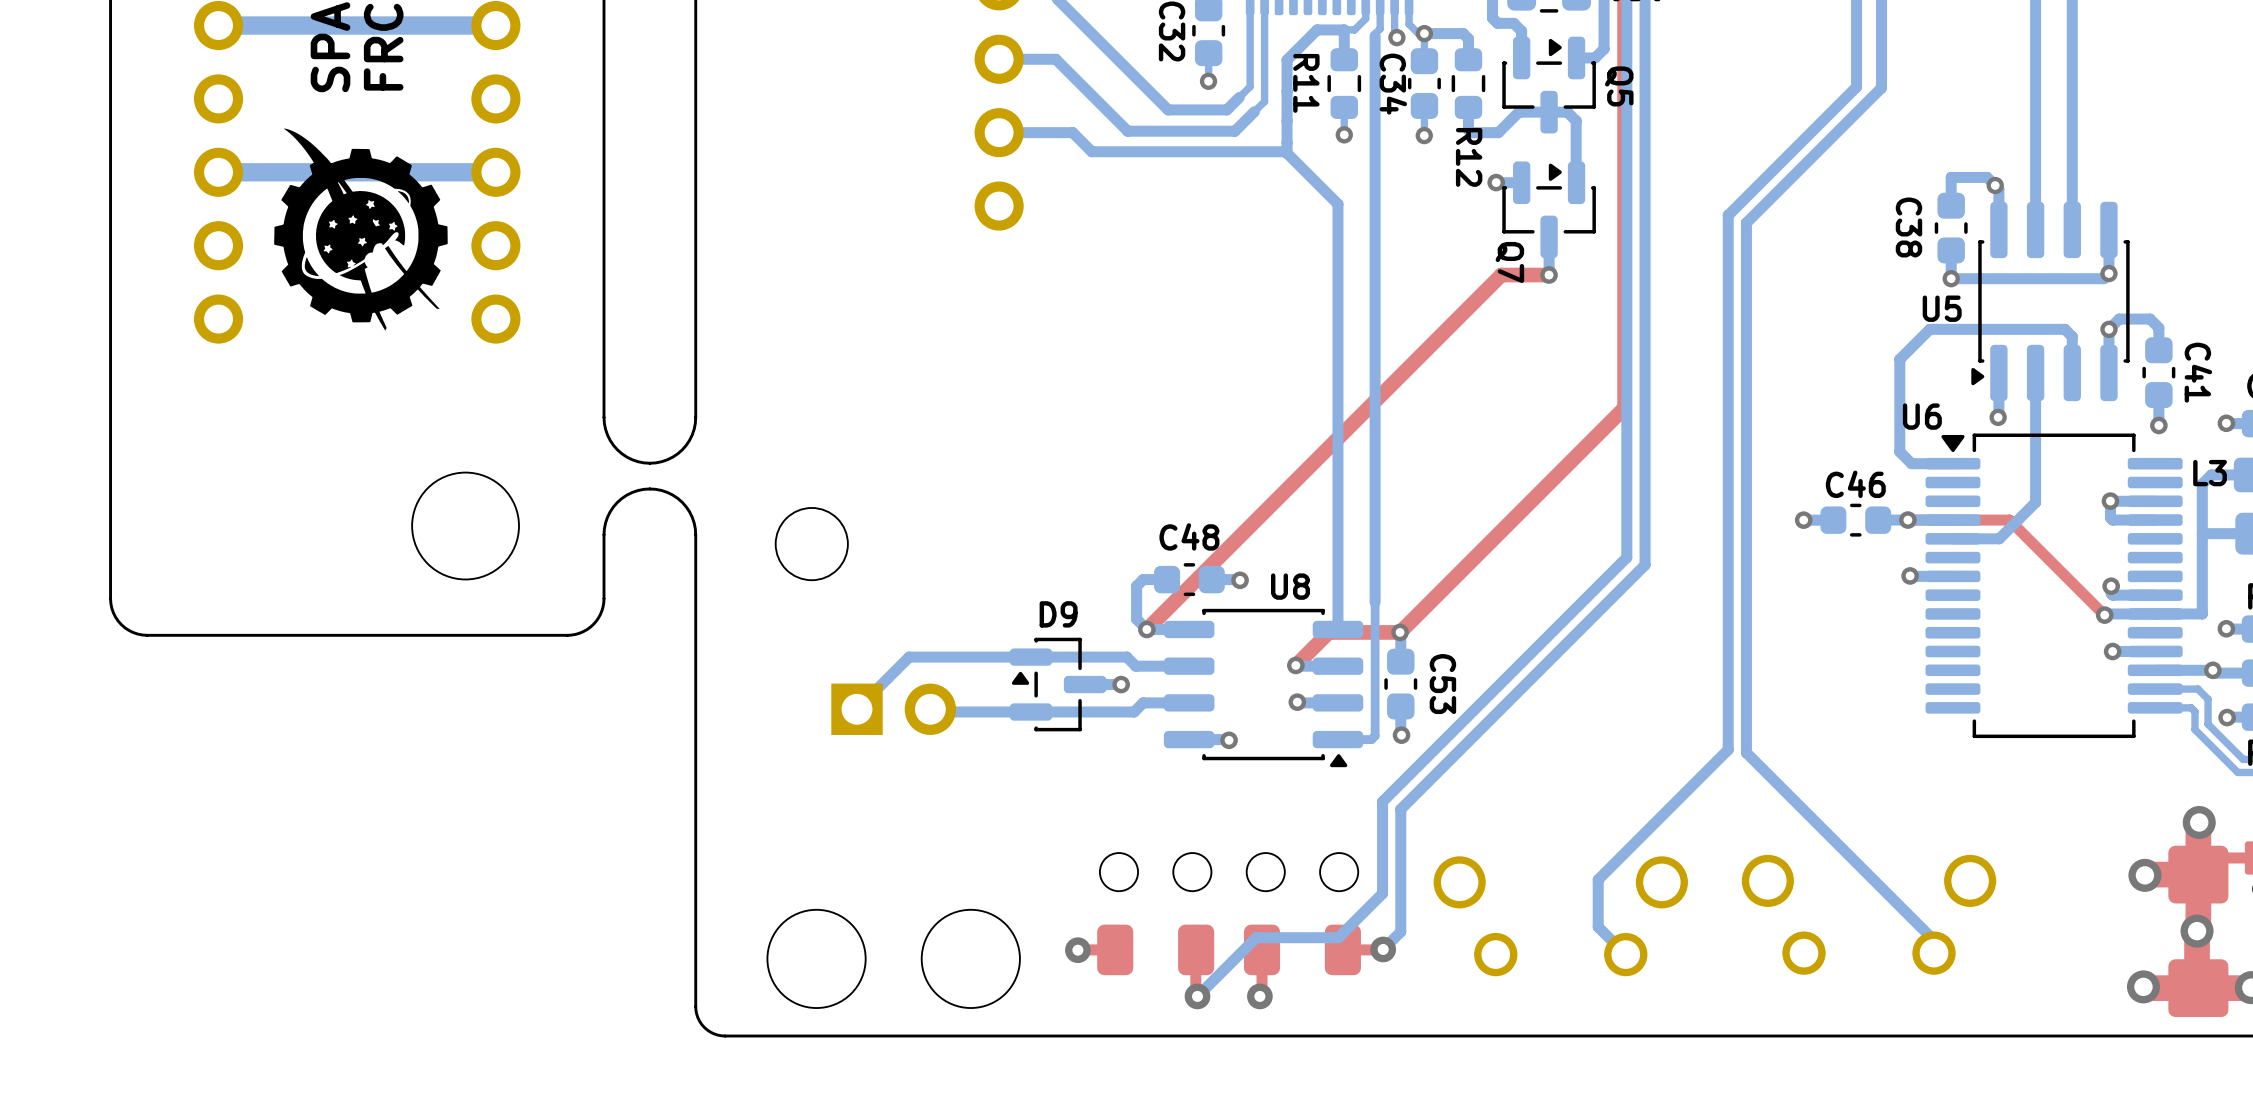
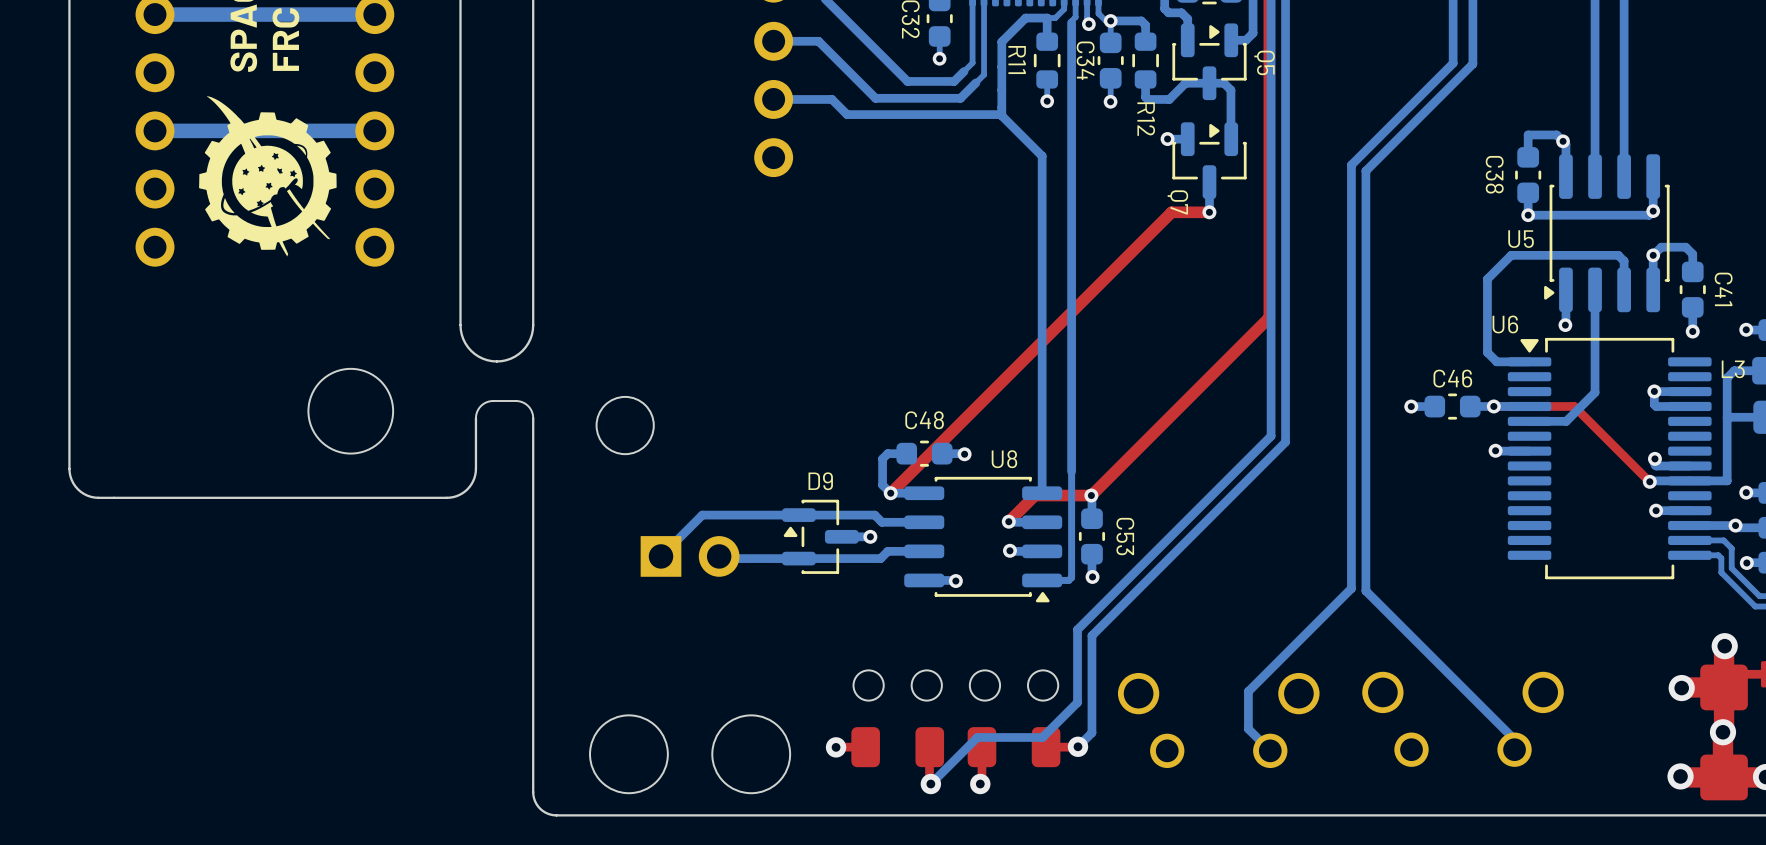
board edge: (695, 534) (694, 522) (689, 511) (677, 498) (667, 492) (655, 489) (643, 489) (632, 492) (621, 498) (610, 511) (604, 528) (604, 598) (601, 610) (590, 627) (579, 633) (567, 635) -> (533, 418) (529, 407) (520, 401) (490, 401) (482, 404) (476, 415) (475, 468) (473, 481) (465, 491) (456, 496) (431, 497)

